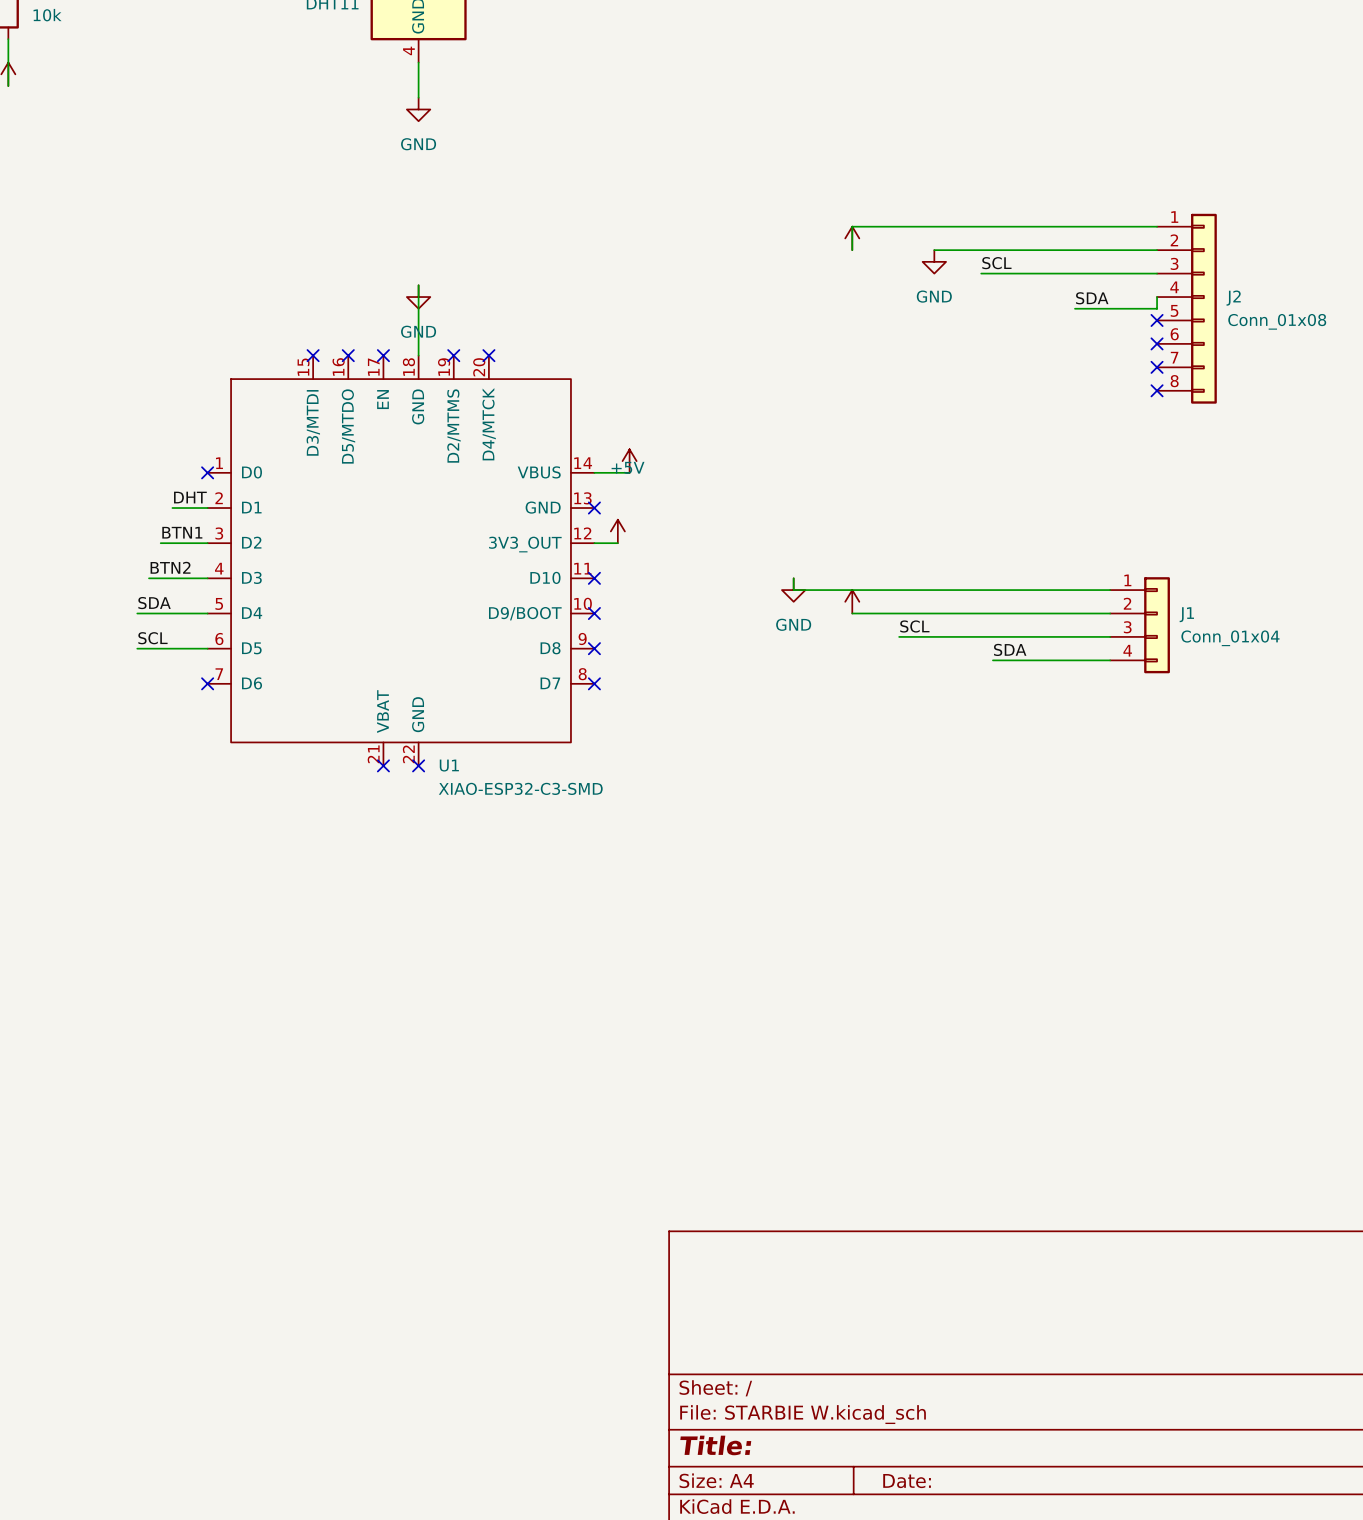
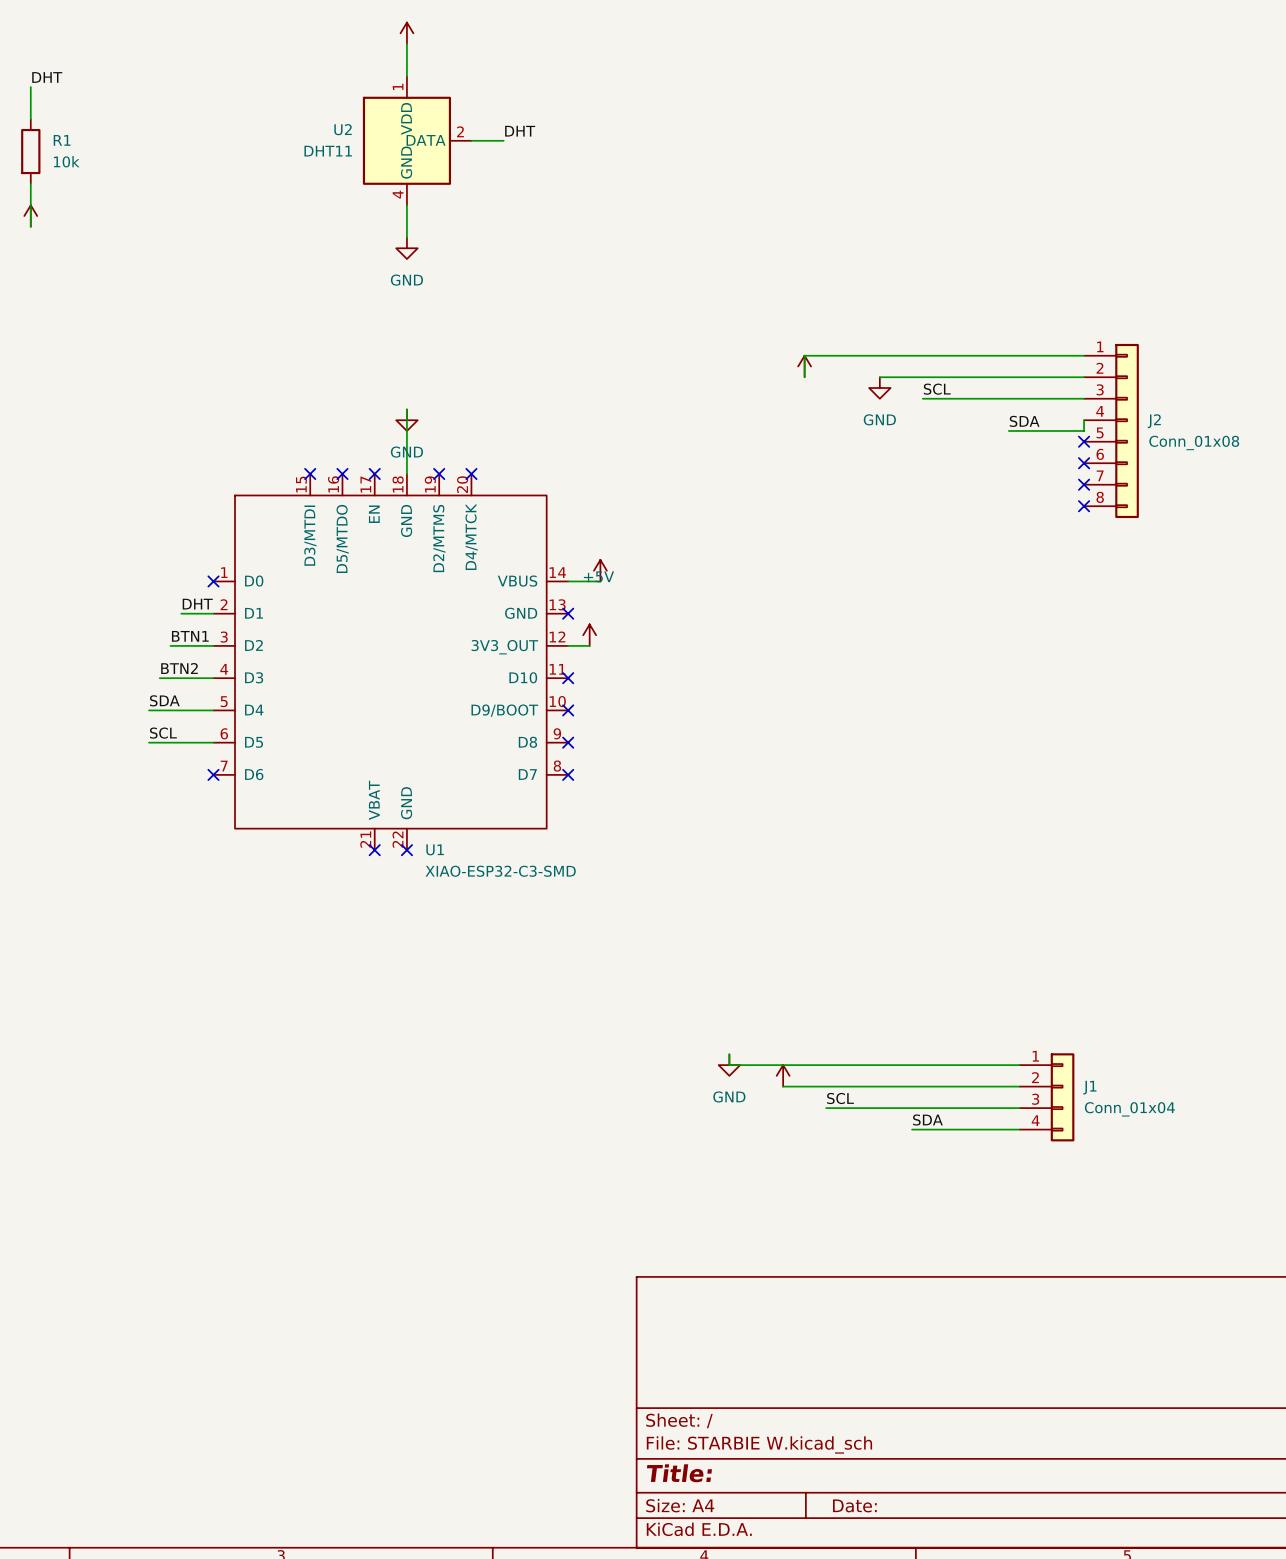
wire: (793, 578) (793, 590) (1110, 590) -> none
power symbol: GND (793, 590) -> none
power symbol: (852, 601) -> none
wire: (852, 613) (1110, 613) -> none
J1 position: (1140, 625) -> (1046, 1097)
label: SCL (914, 626) -> none
wire: (899, 636) (1110, 636) -> none
label: SDA (1010, 649) -> none
wire: (992, 660) (1110, 660) -> none
wire: none -> (729, 1054) (729, 1065) (1019, 1065)
power symbol: none -> GND (729, 1065)
power symbol: none -> (783, 1075)
wire: none -> (783, 1086) (1019, 1086)
label: none -> SCL (840, 1098)
wire: none -> (826, 1108) (1019, 1108)
label: none -> SDA (927, 1120)
wire: none -> (912, 1129) (1019, 1129)

